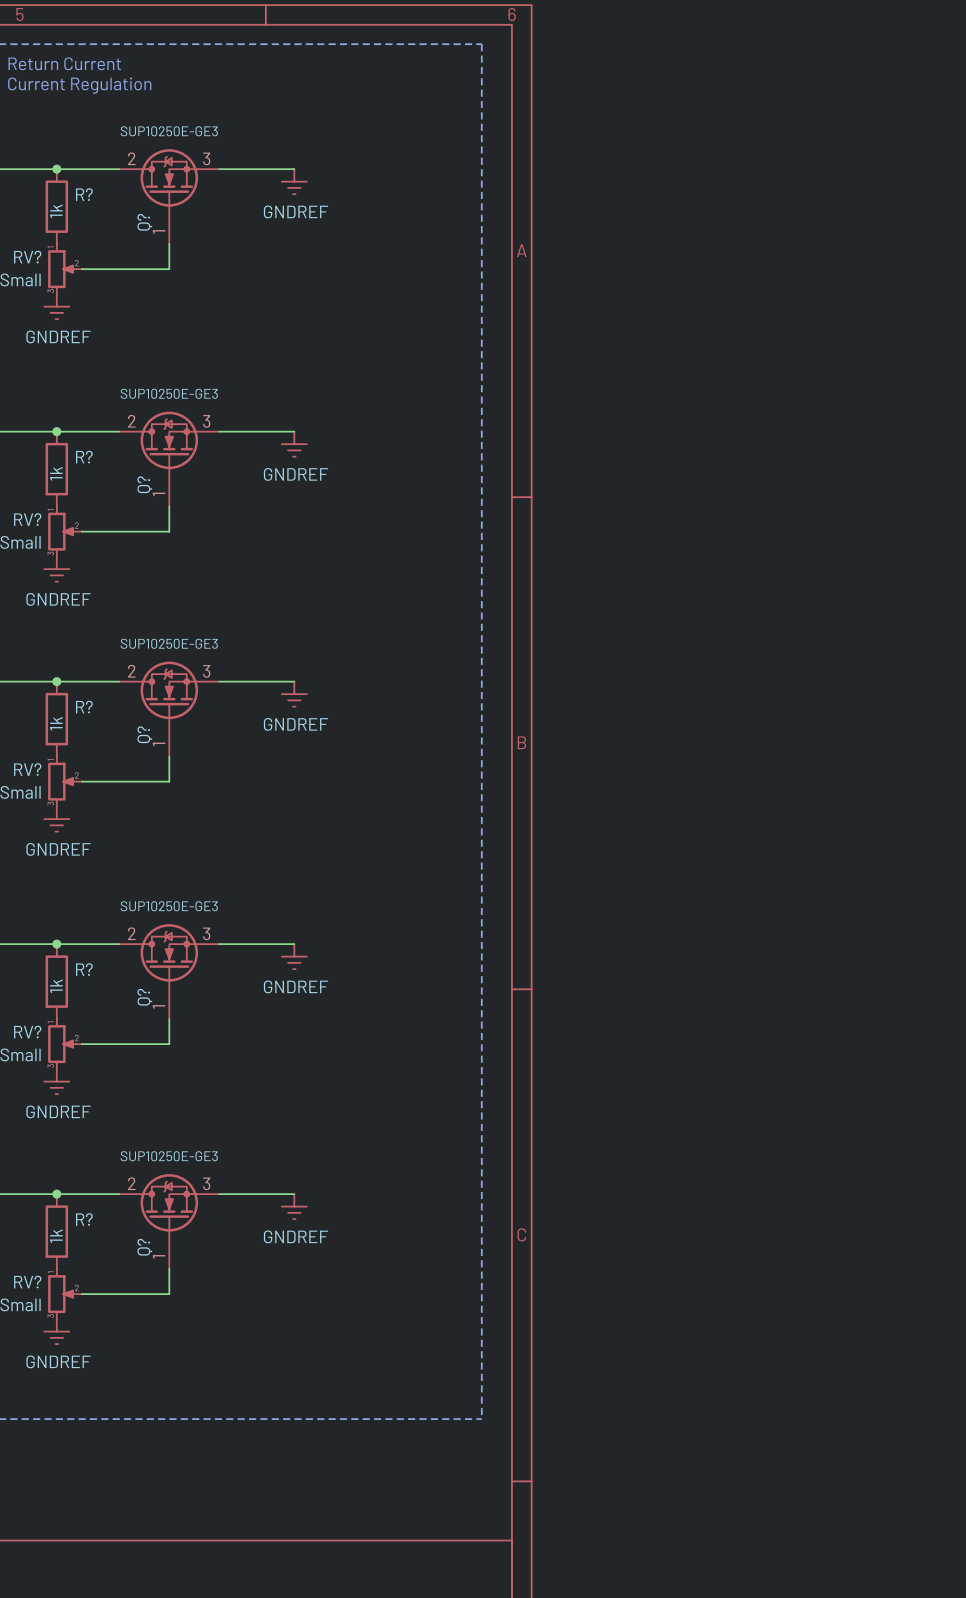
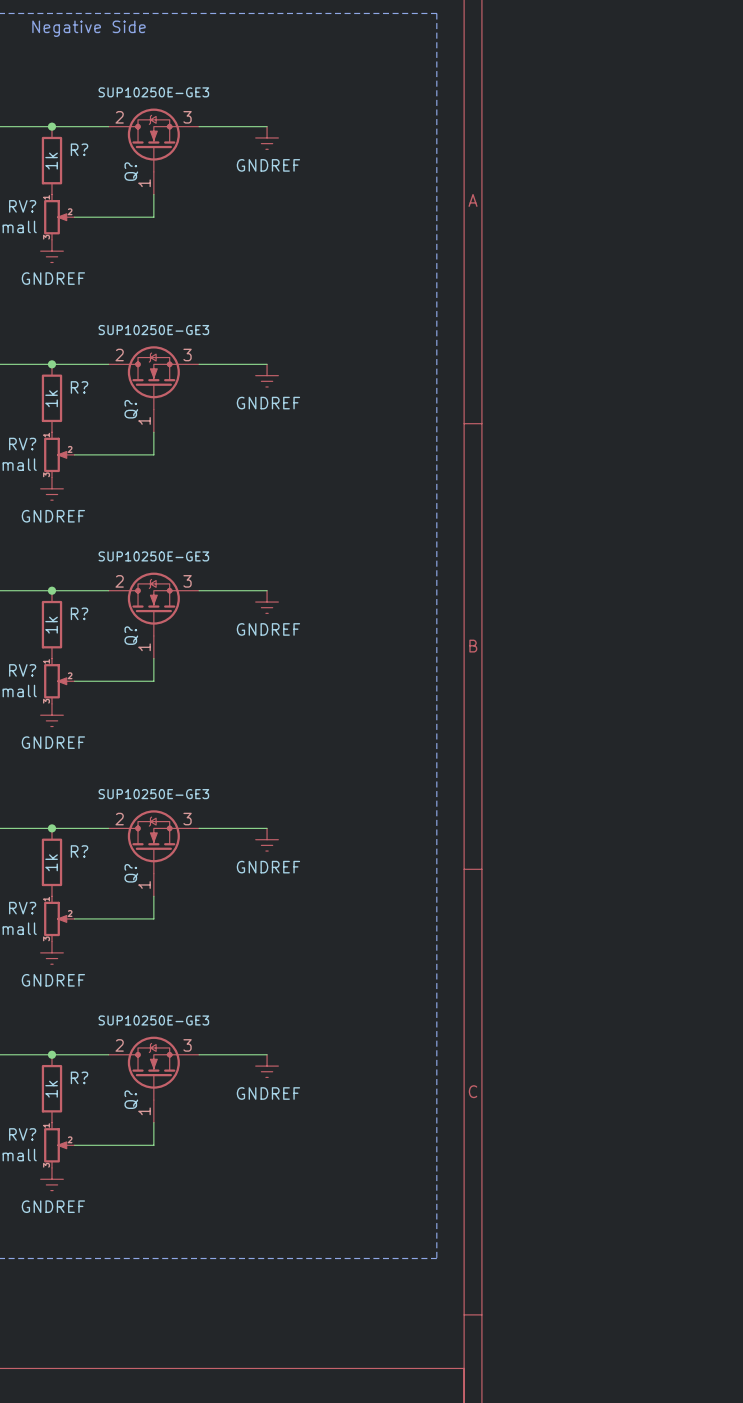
text: none -> Negative Side (88, 28)
text: Return Current (64, 63) -> none
text: Current Regulation (79, 85) -> none

